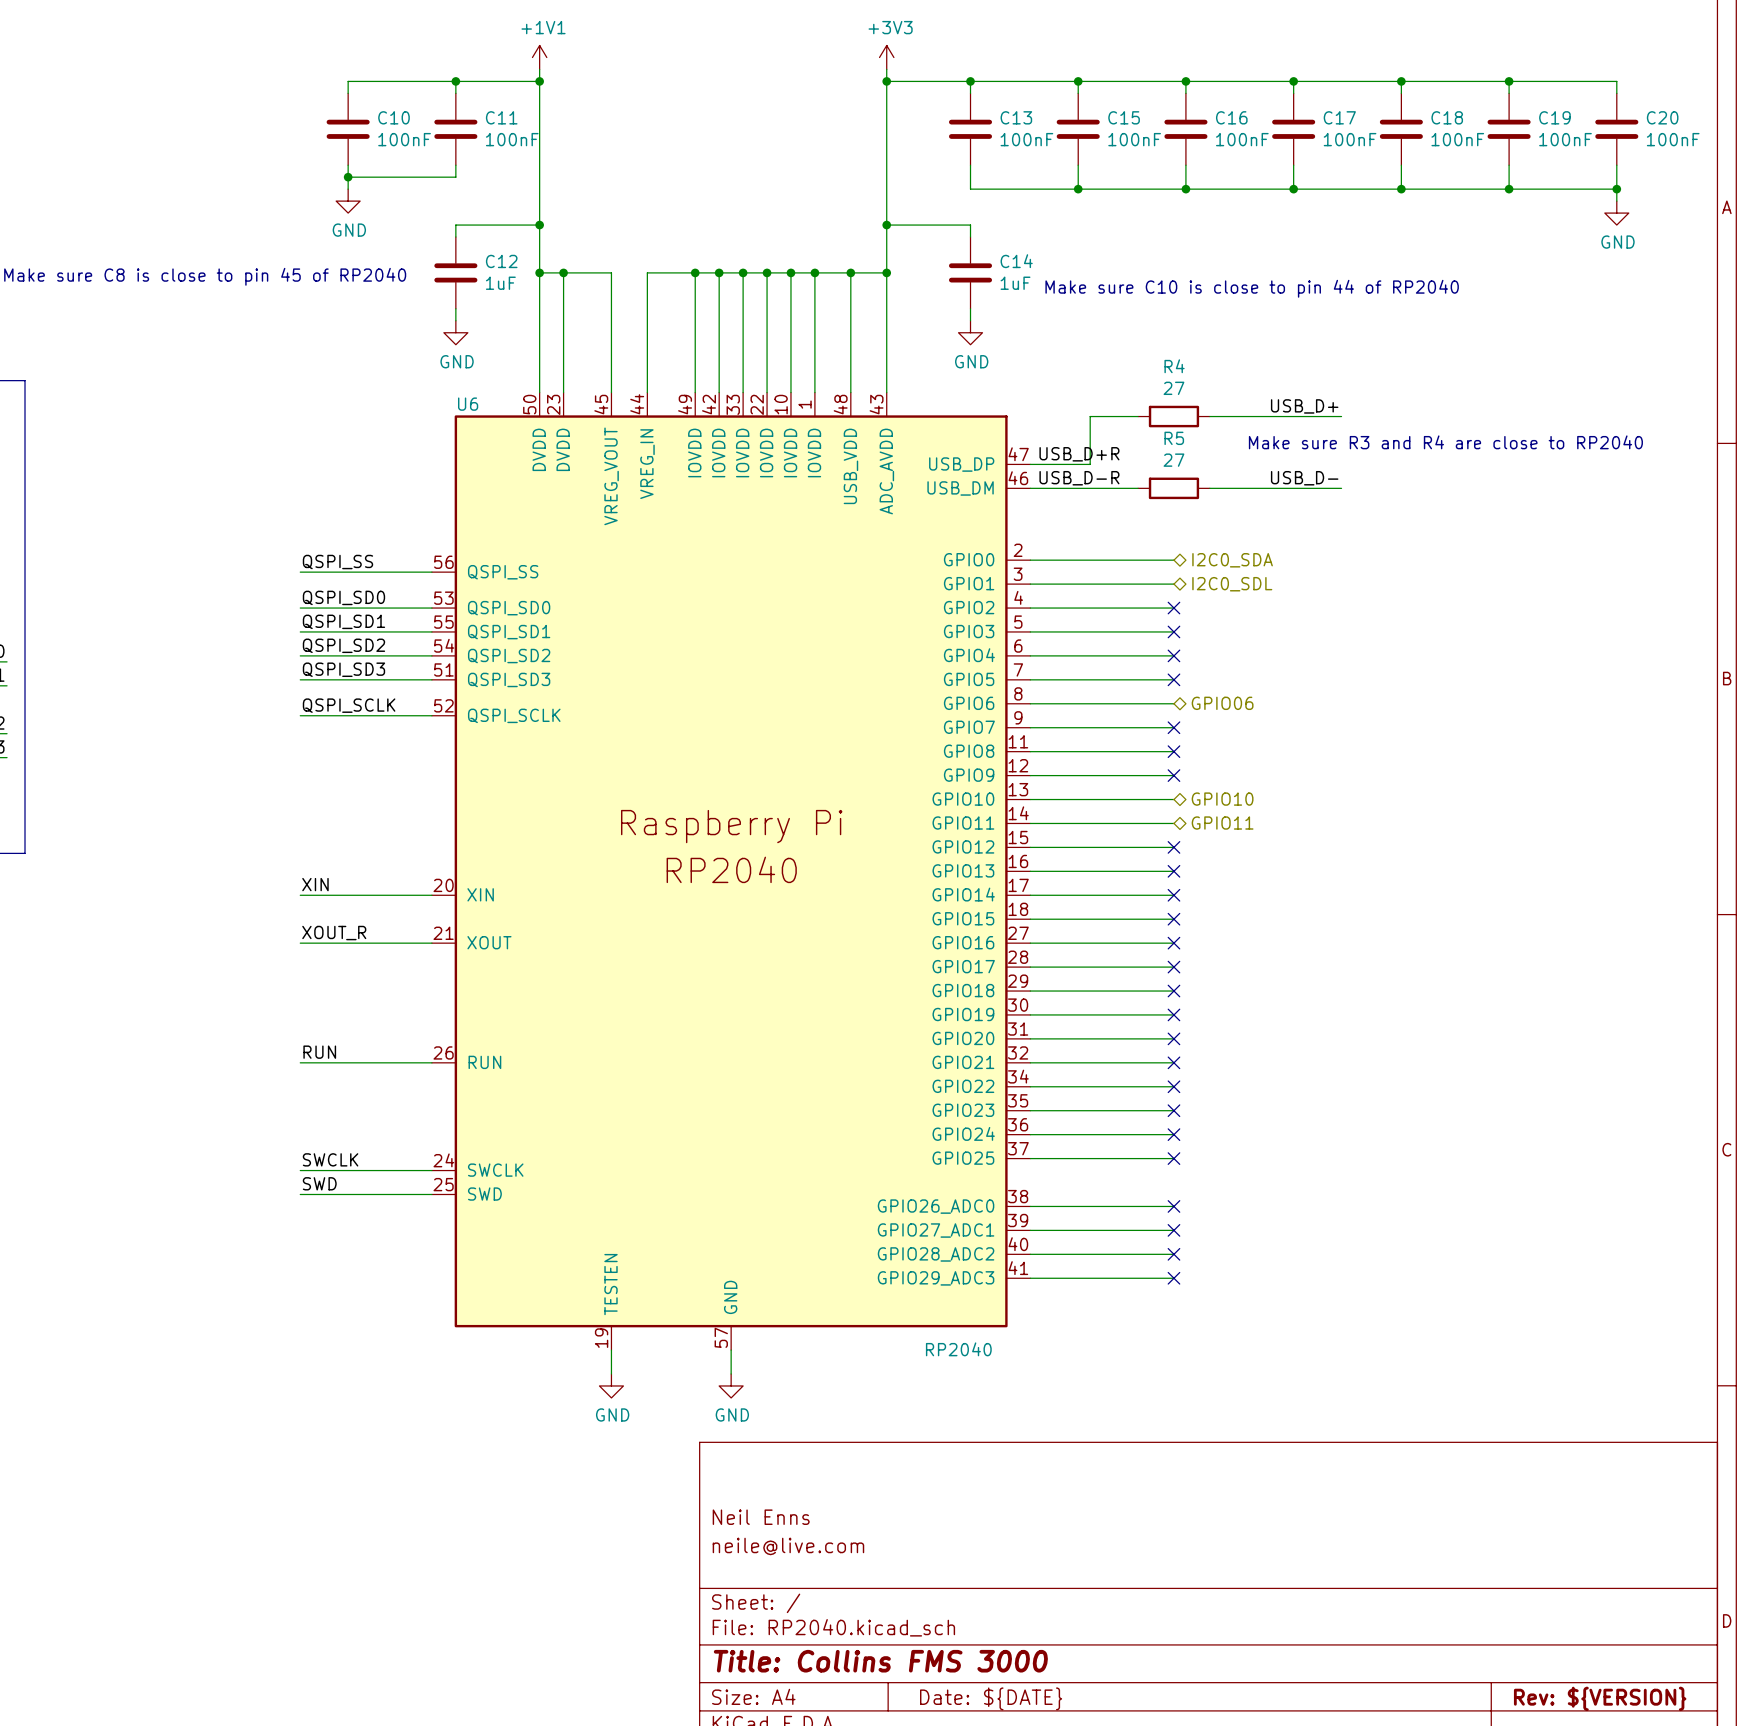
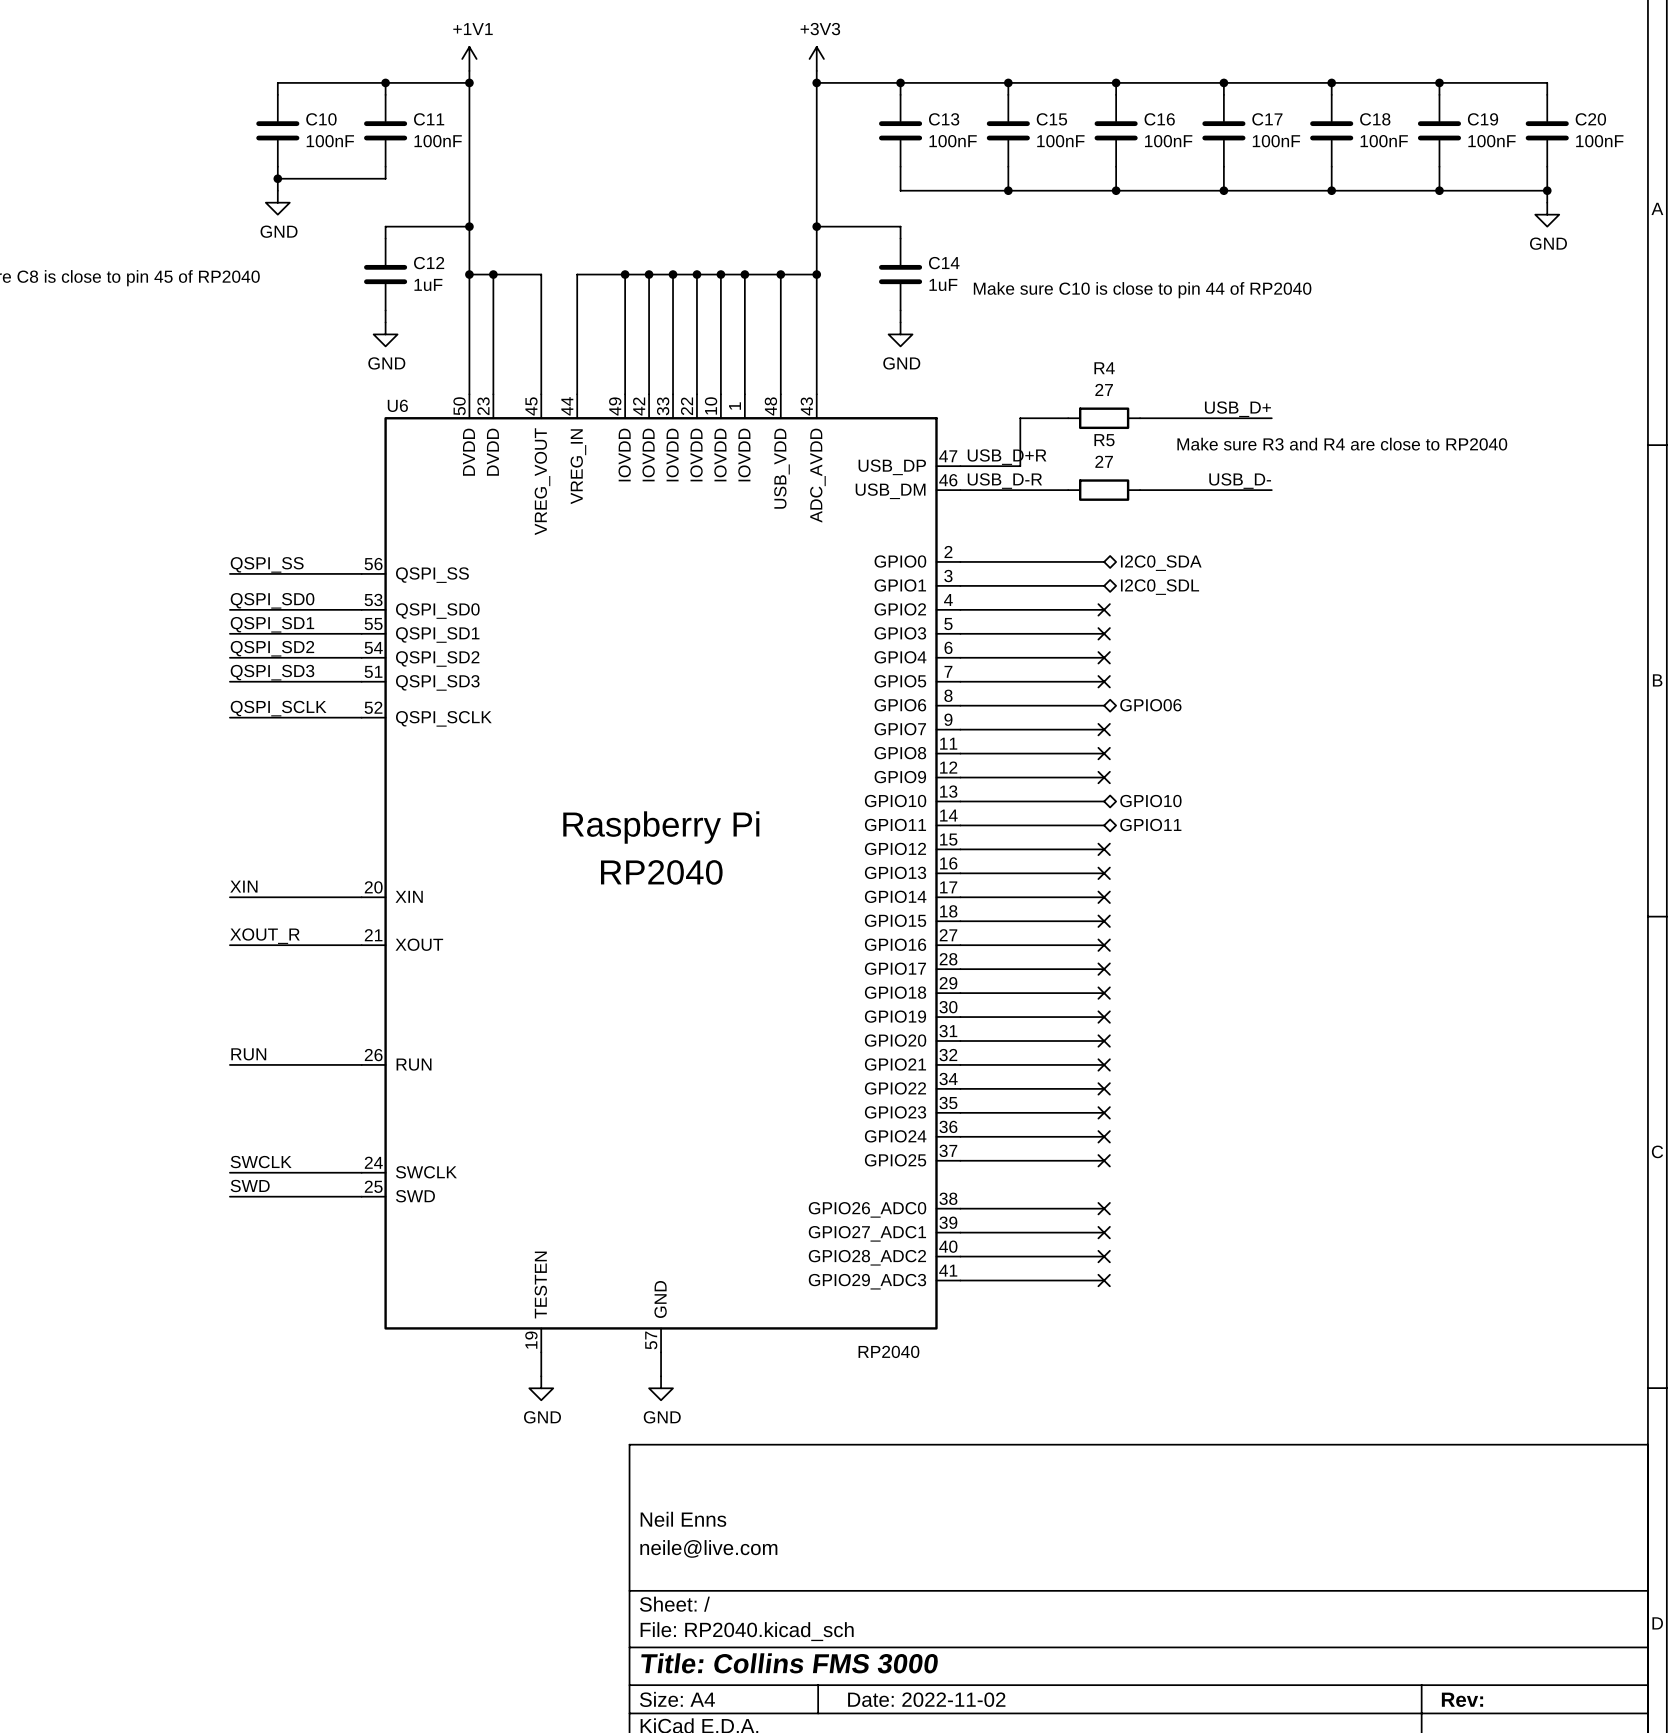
title block: Date: ${DATE} (991, 1698) -> Date: 2022-11-02 (926, 1699)
title block: Rev: ${VERSION} (1600, 1698) -> Rev: (1462, 1699)

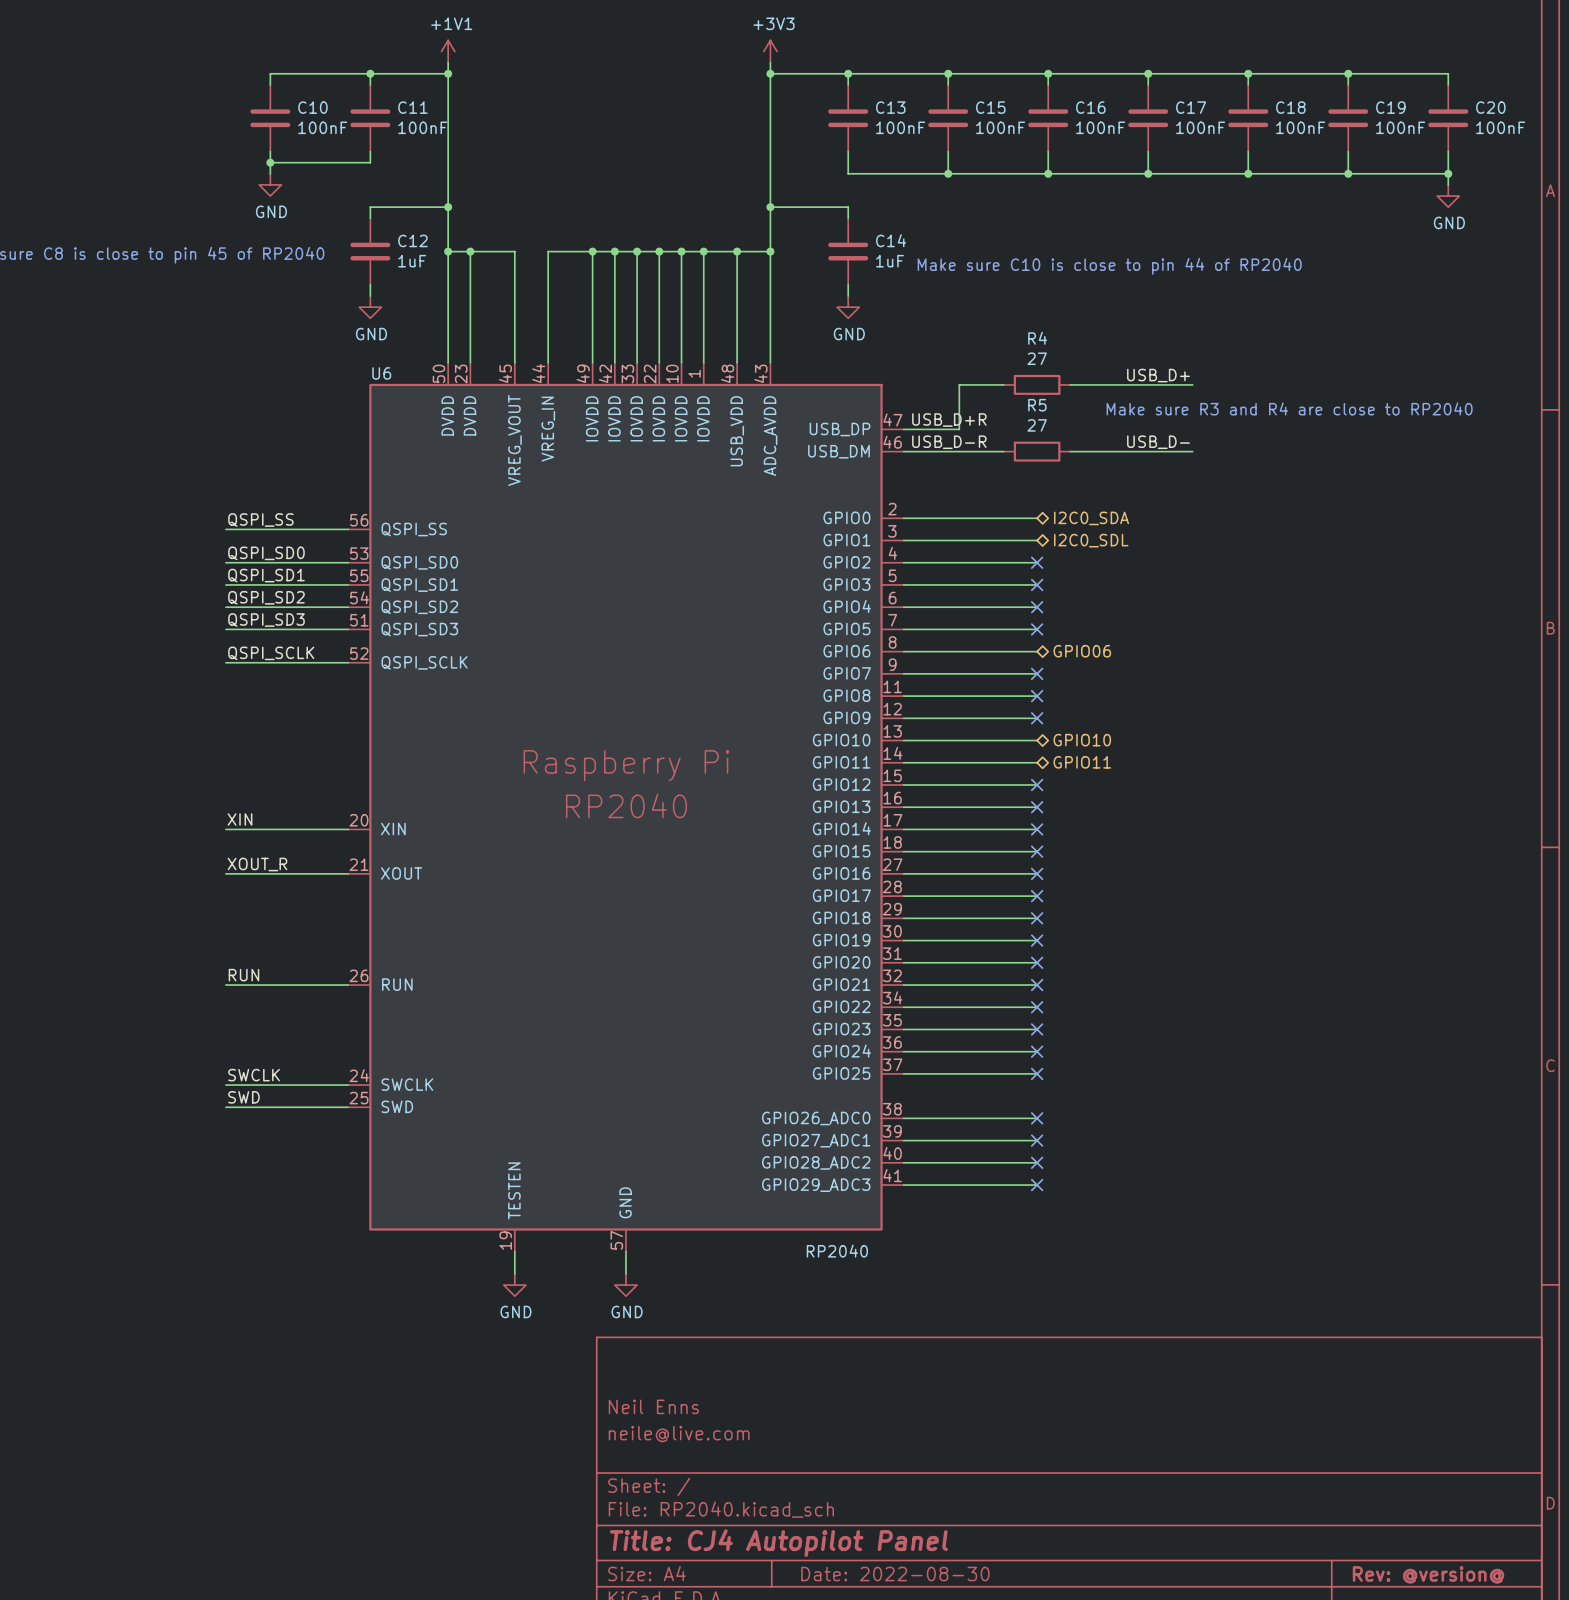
title block: Title: Collins FMS 3000 (789, 1663) -> Title: CJ4 Autopilot Panel (778, 1543)
title block: Date: 2022-11-02 (926, 1699) -> Date: 2022-08-30 (895, 1574)
title block: Rev: (1462, 1699) -> Rev: @version@ (1428, 1574)

